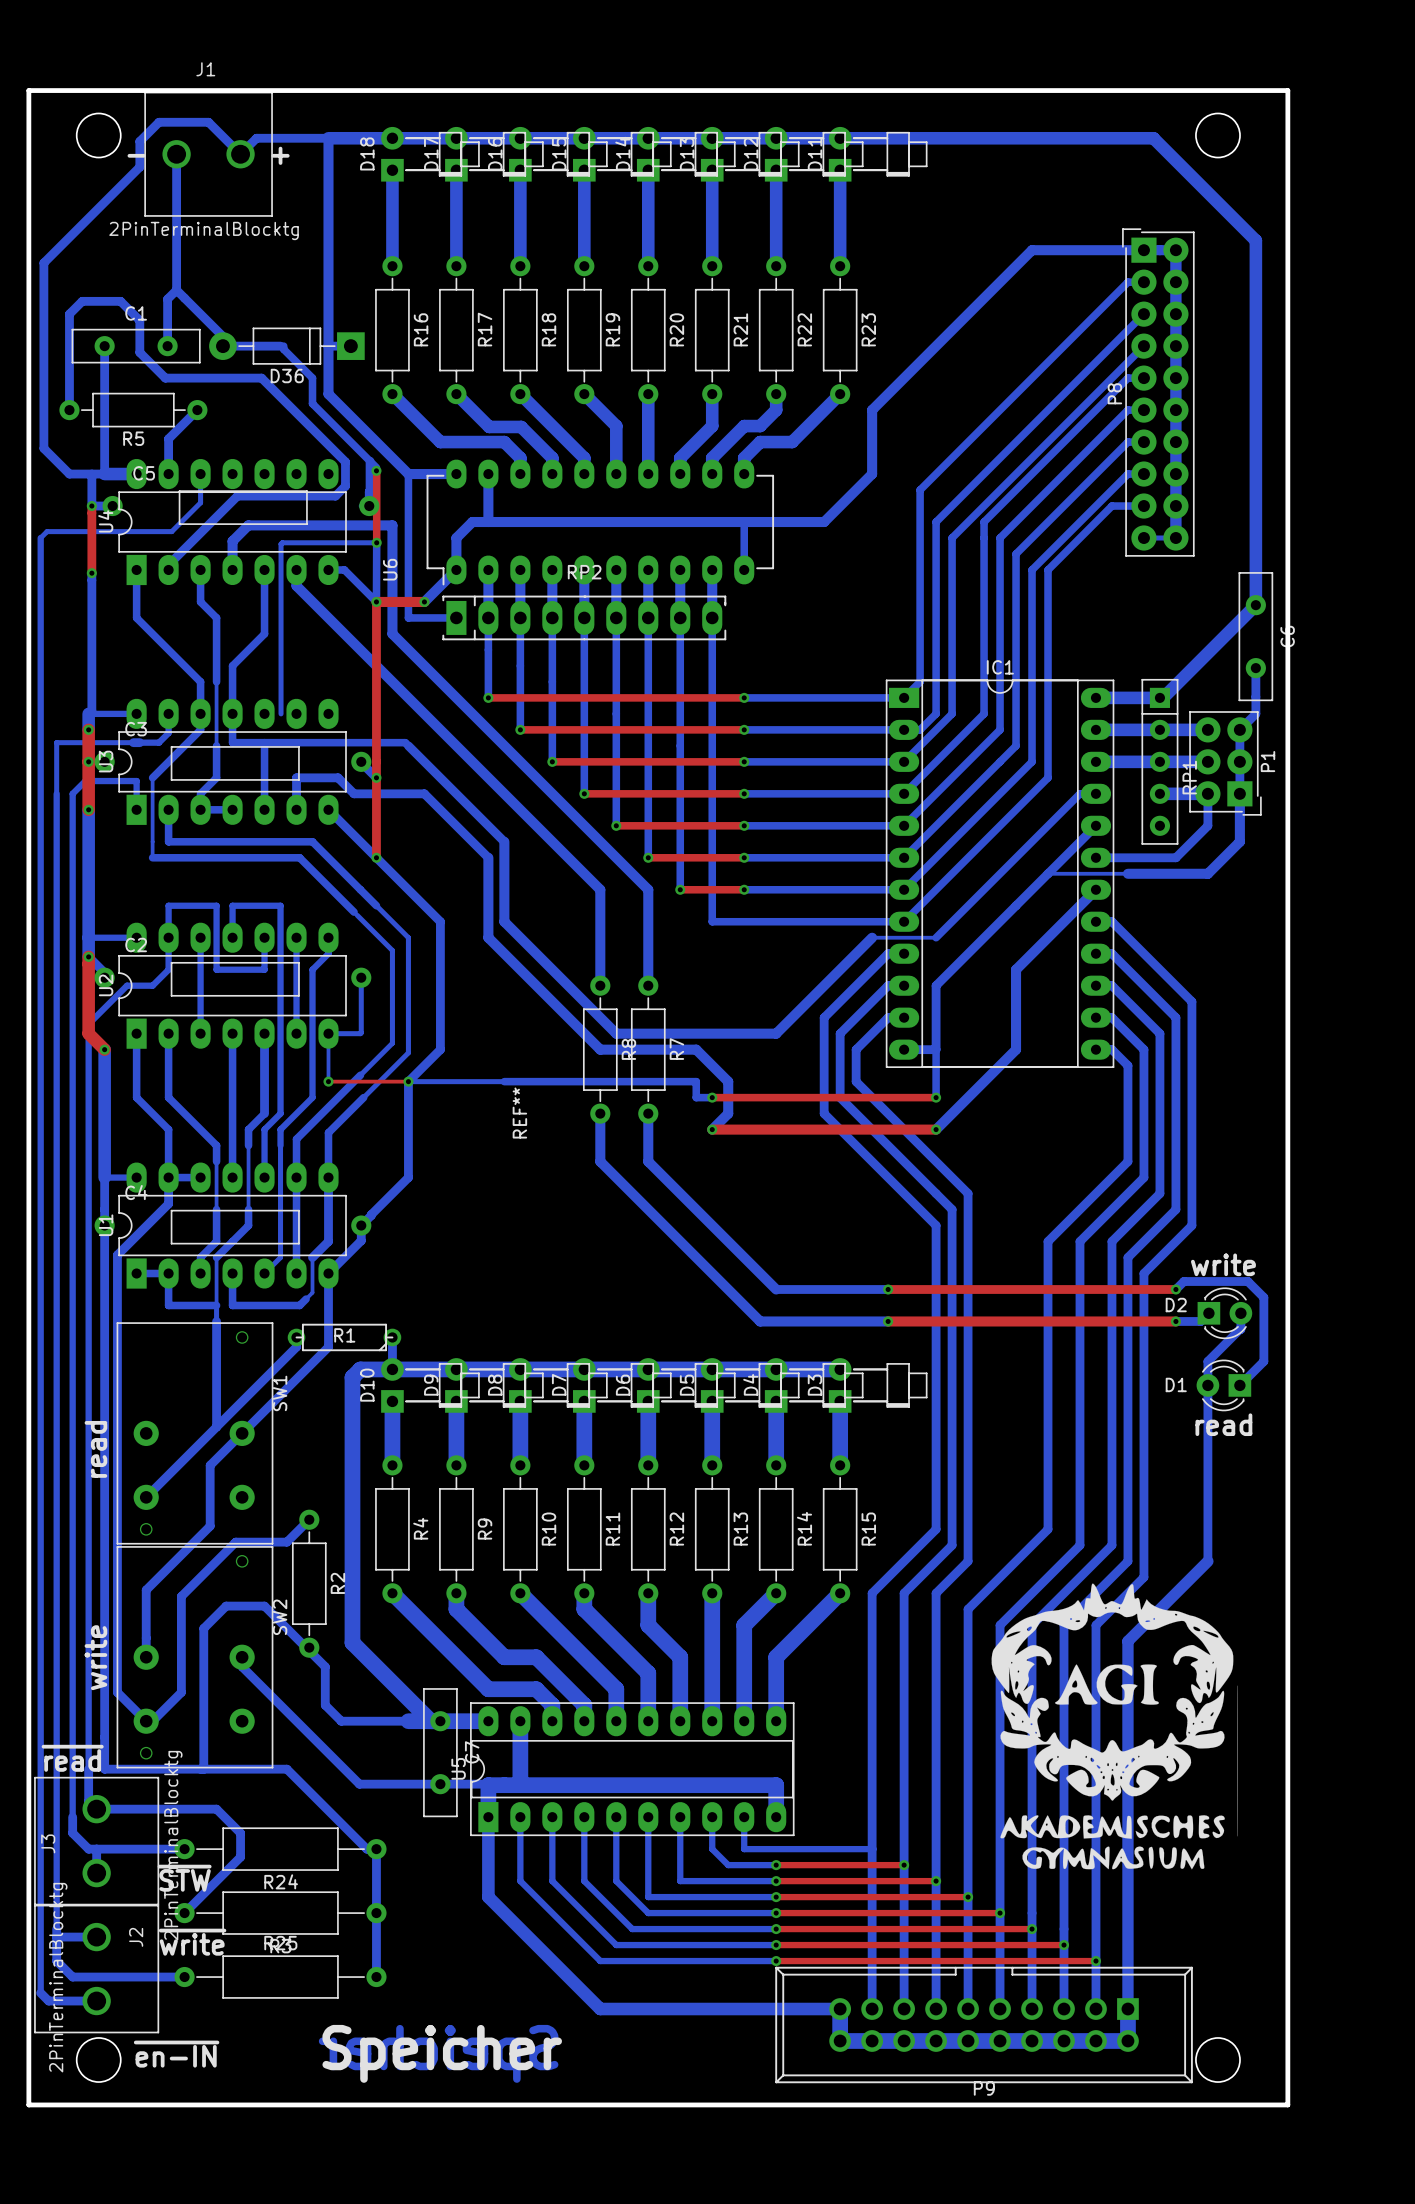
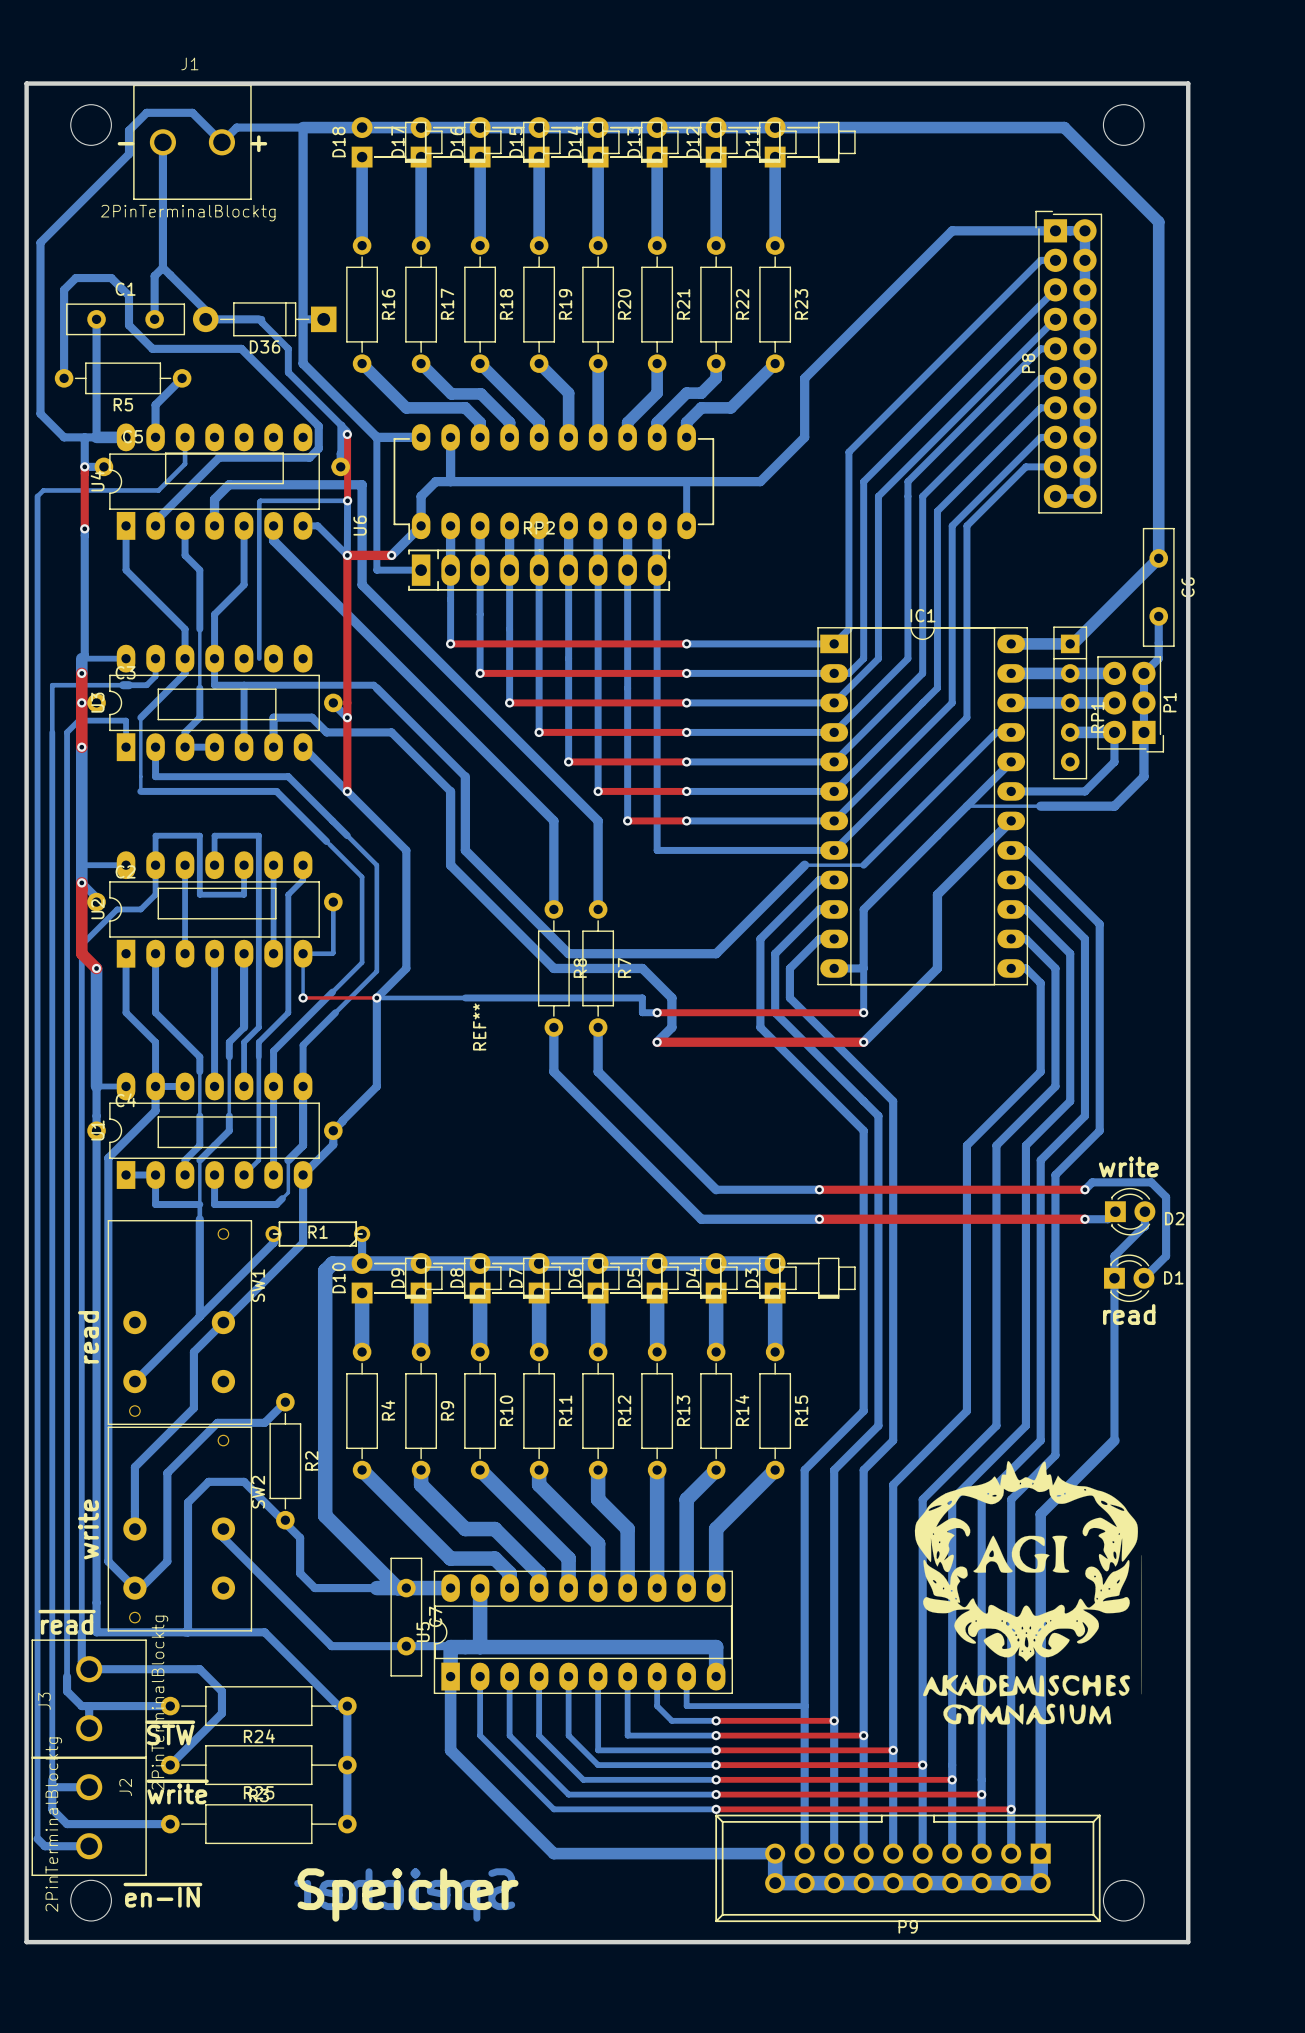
D2 name position: D2 (1176, 1305) -> D2 (1174, 1218)
D1 rotation: 0° (1223, 1385) -> 180° (1129, 1278)

